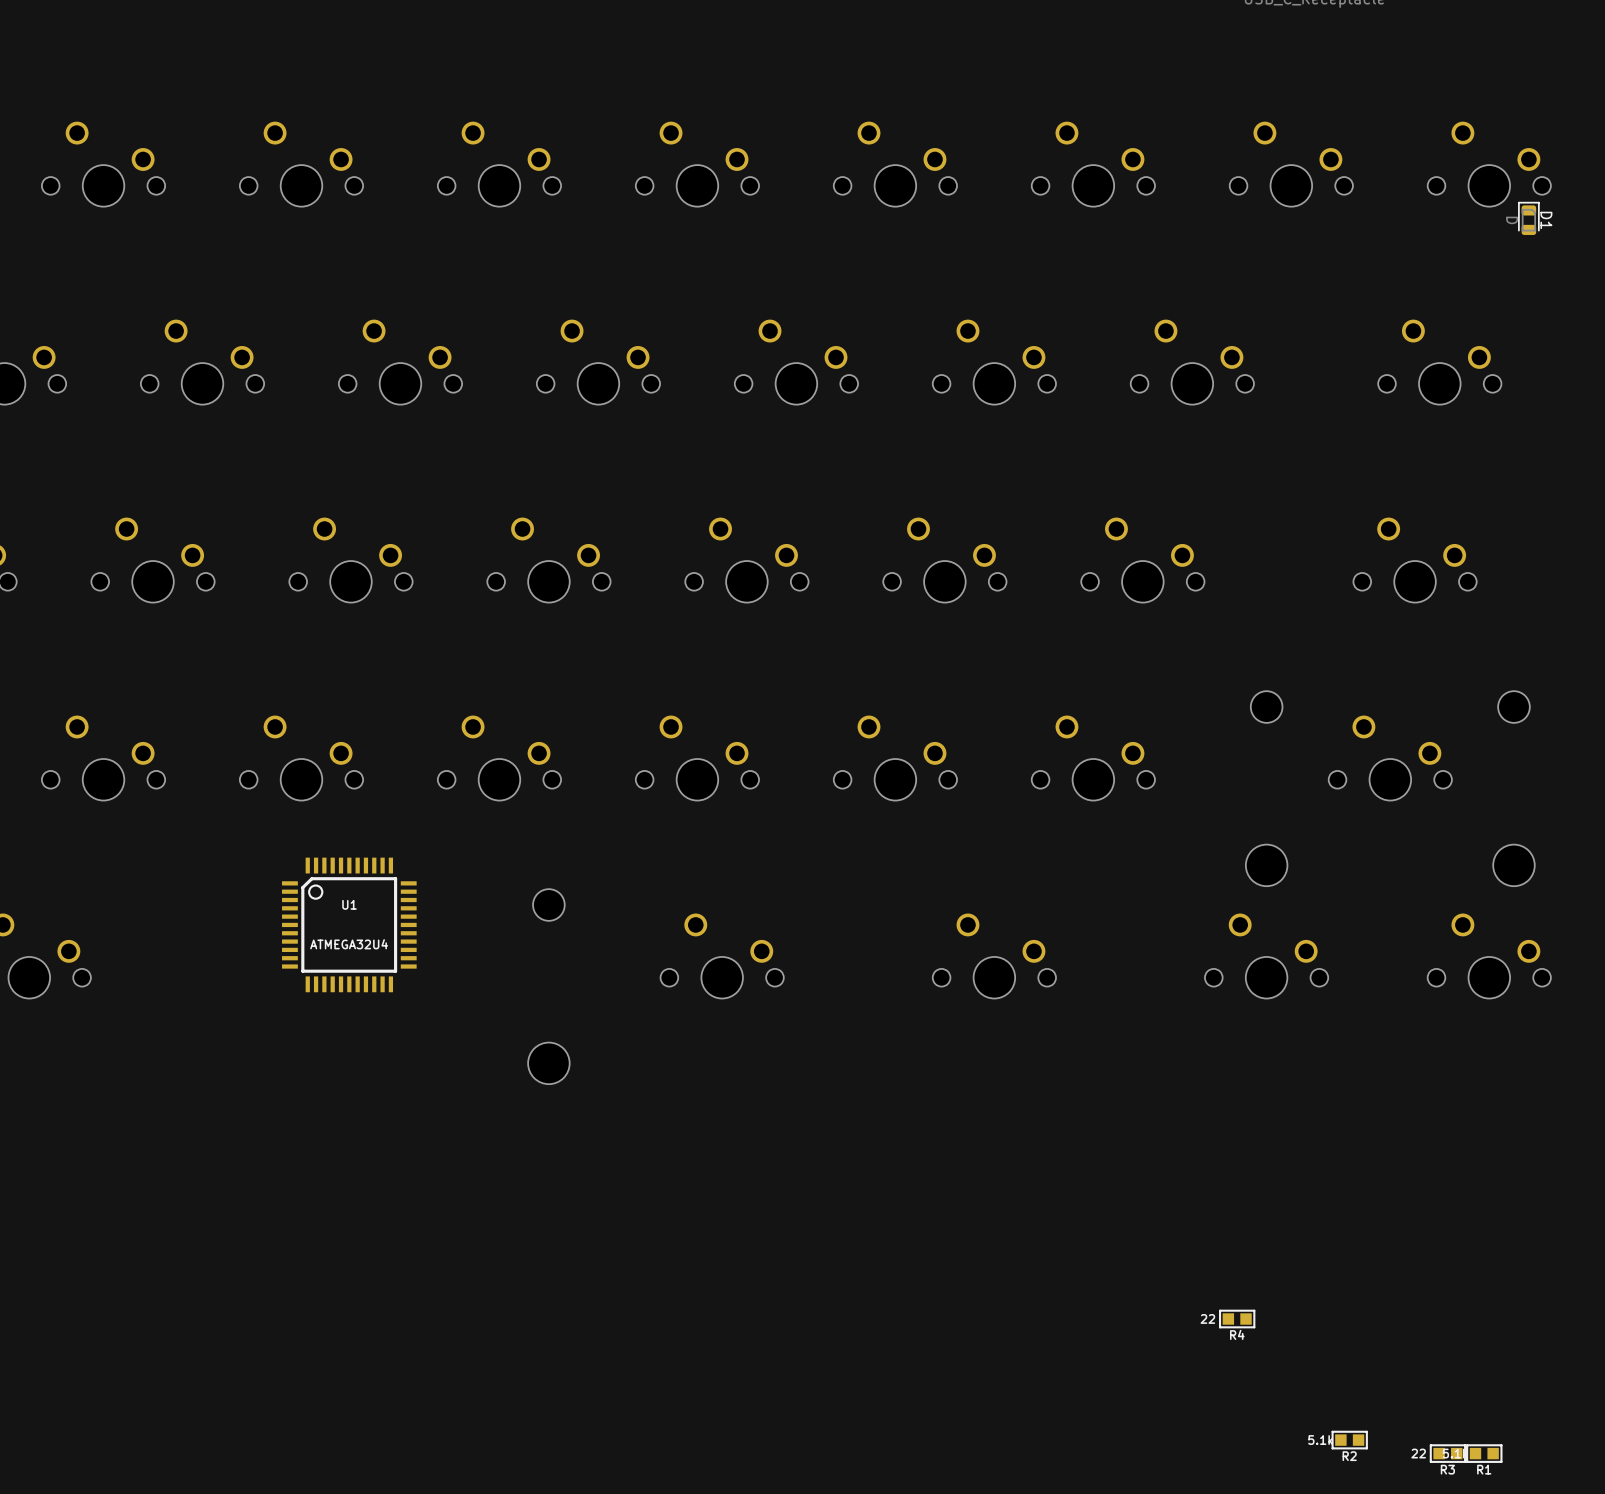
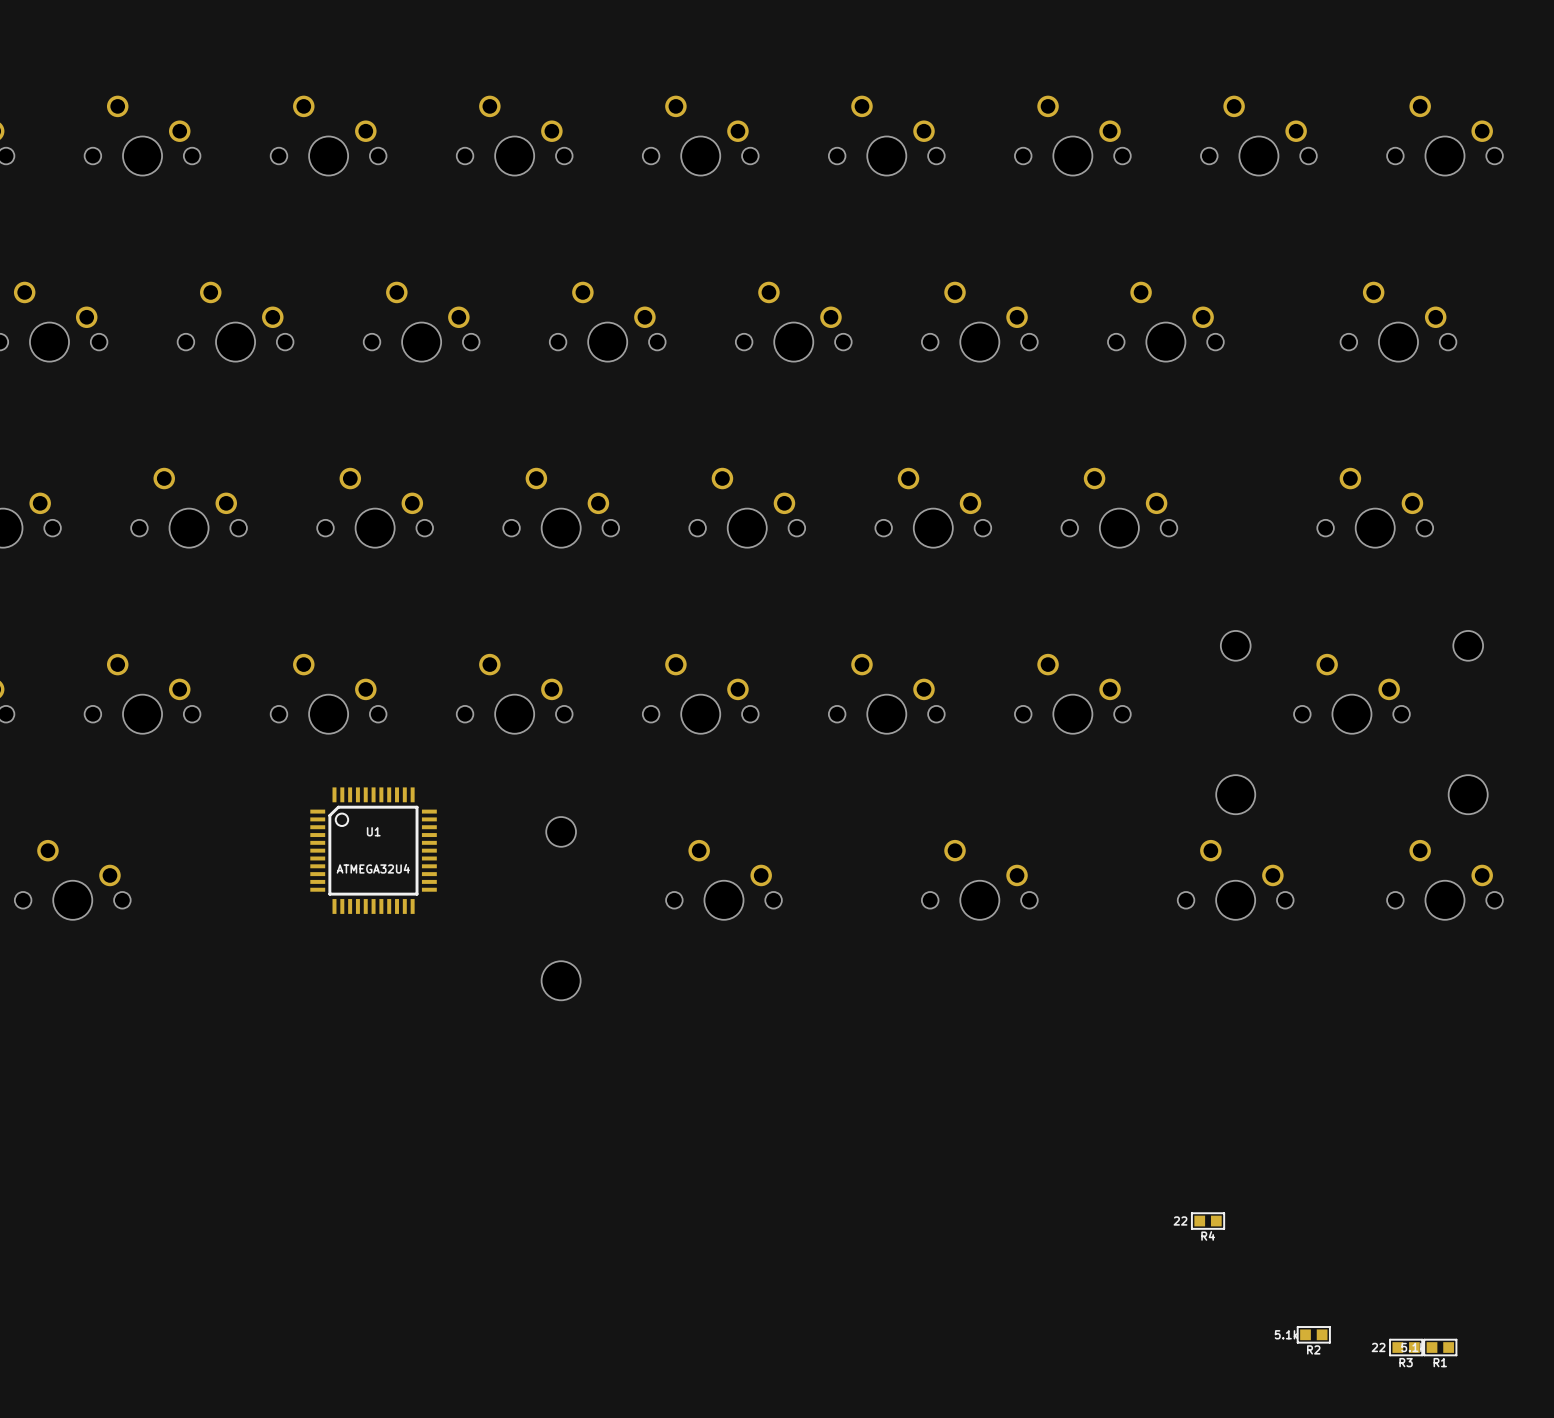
D1: D (1528, 218) -> none

